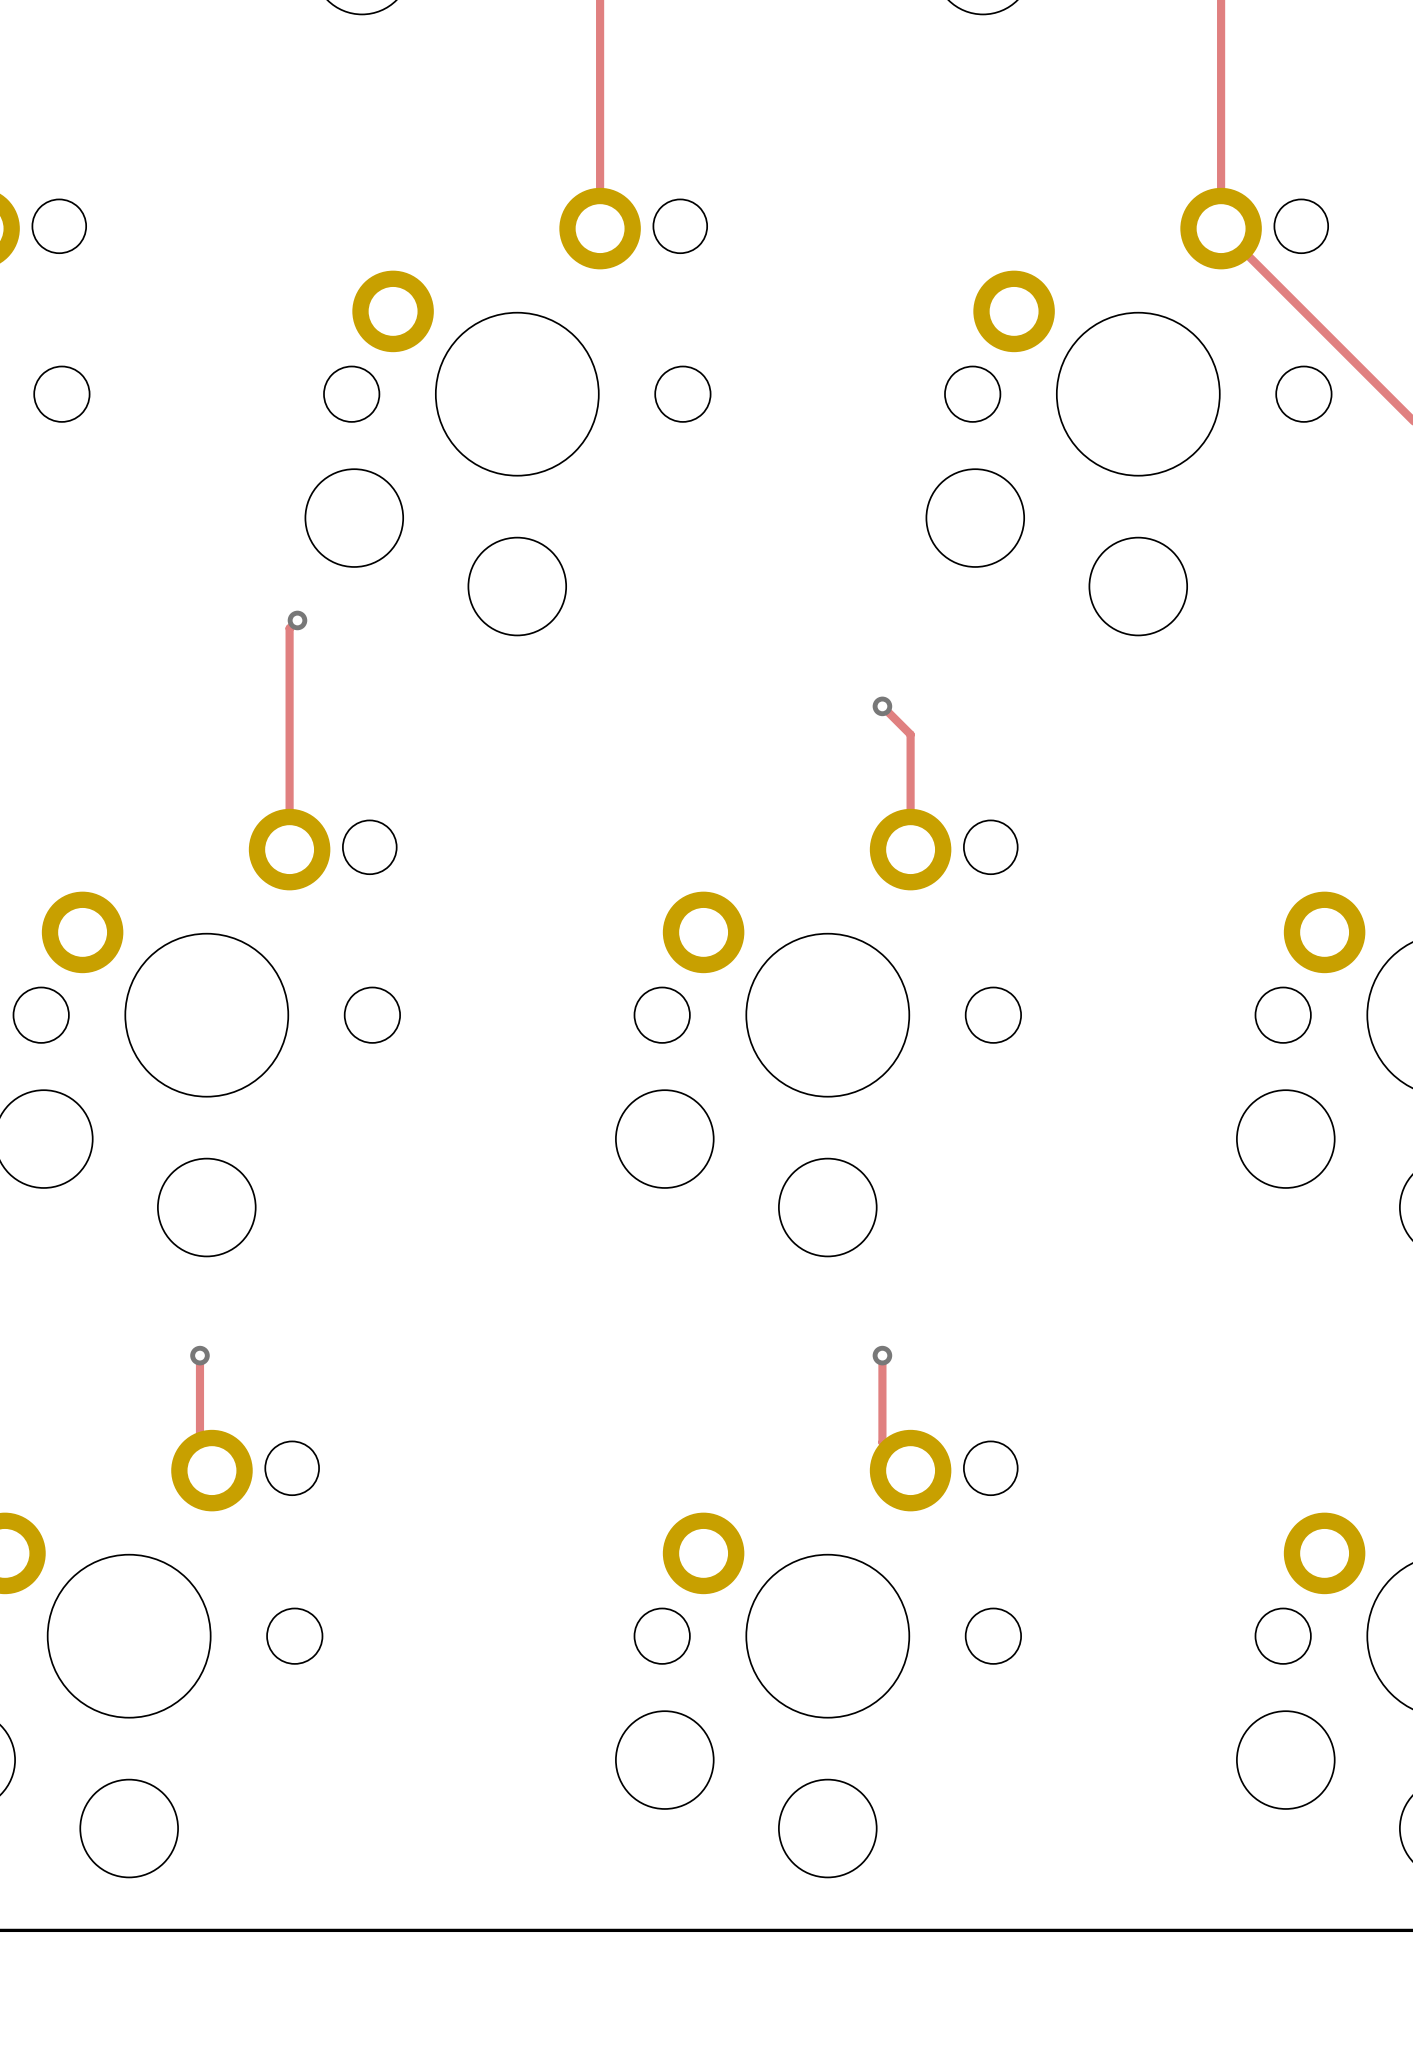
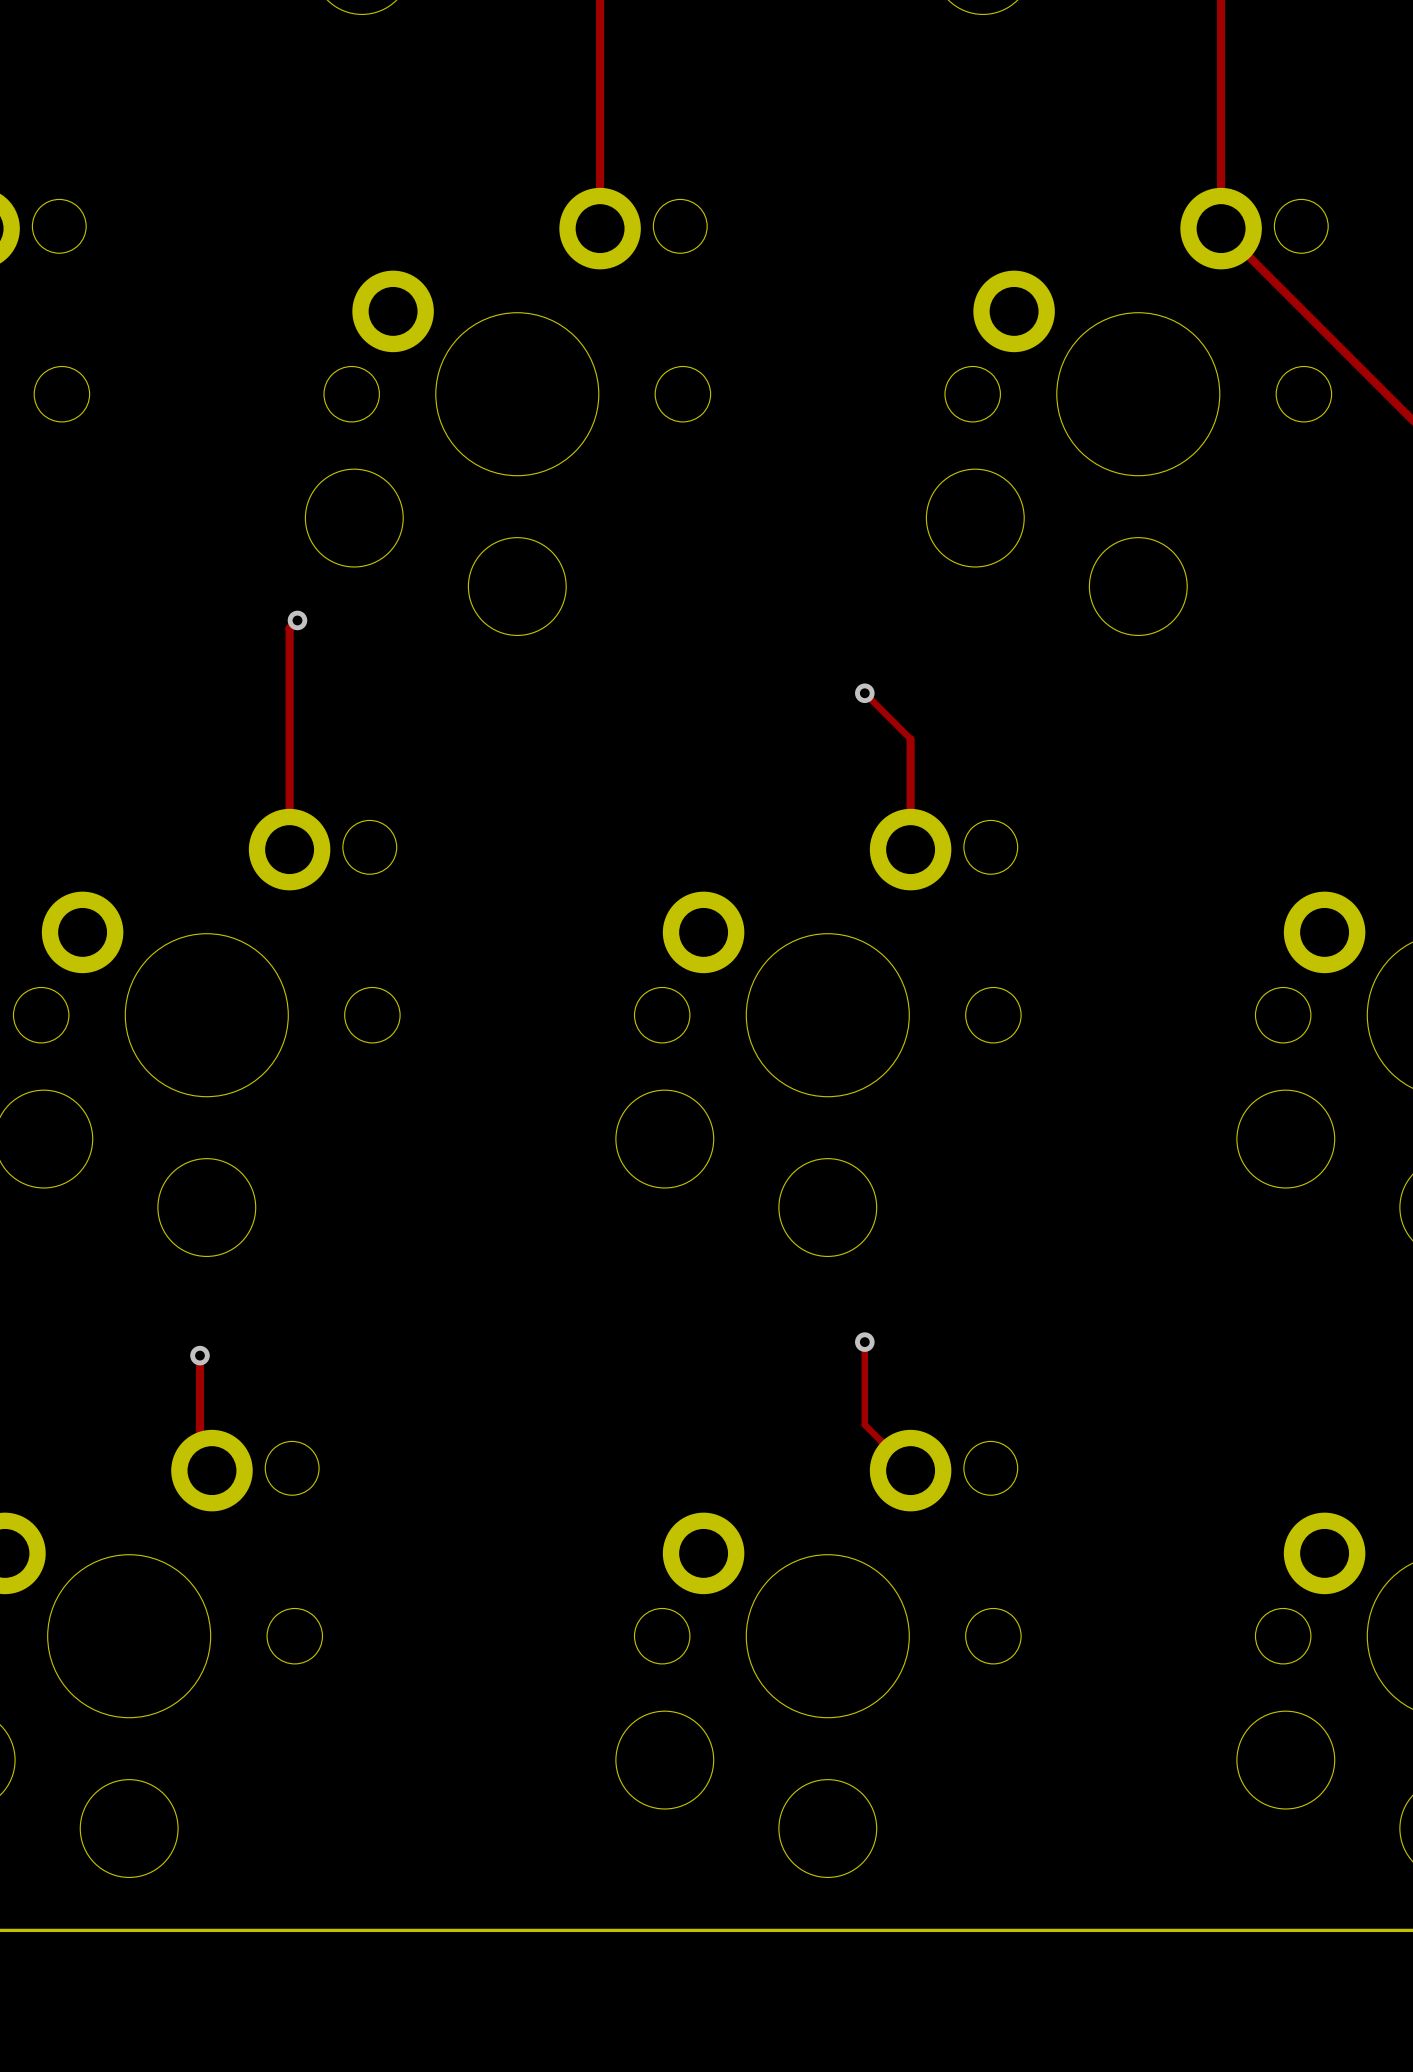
track: (882, 706) (910, 734) (910, 739) -> (864, 693) (910, 739)
via position: (882, 706) -> (864, 693)
track: (882, 1355) (882, 1442) -> (864, 1342) (864, 1424) (882, 1442)
via position: (882, 1355) -> (864, 1342)

